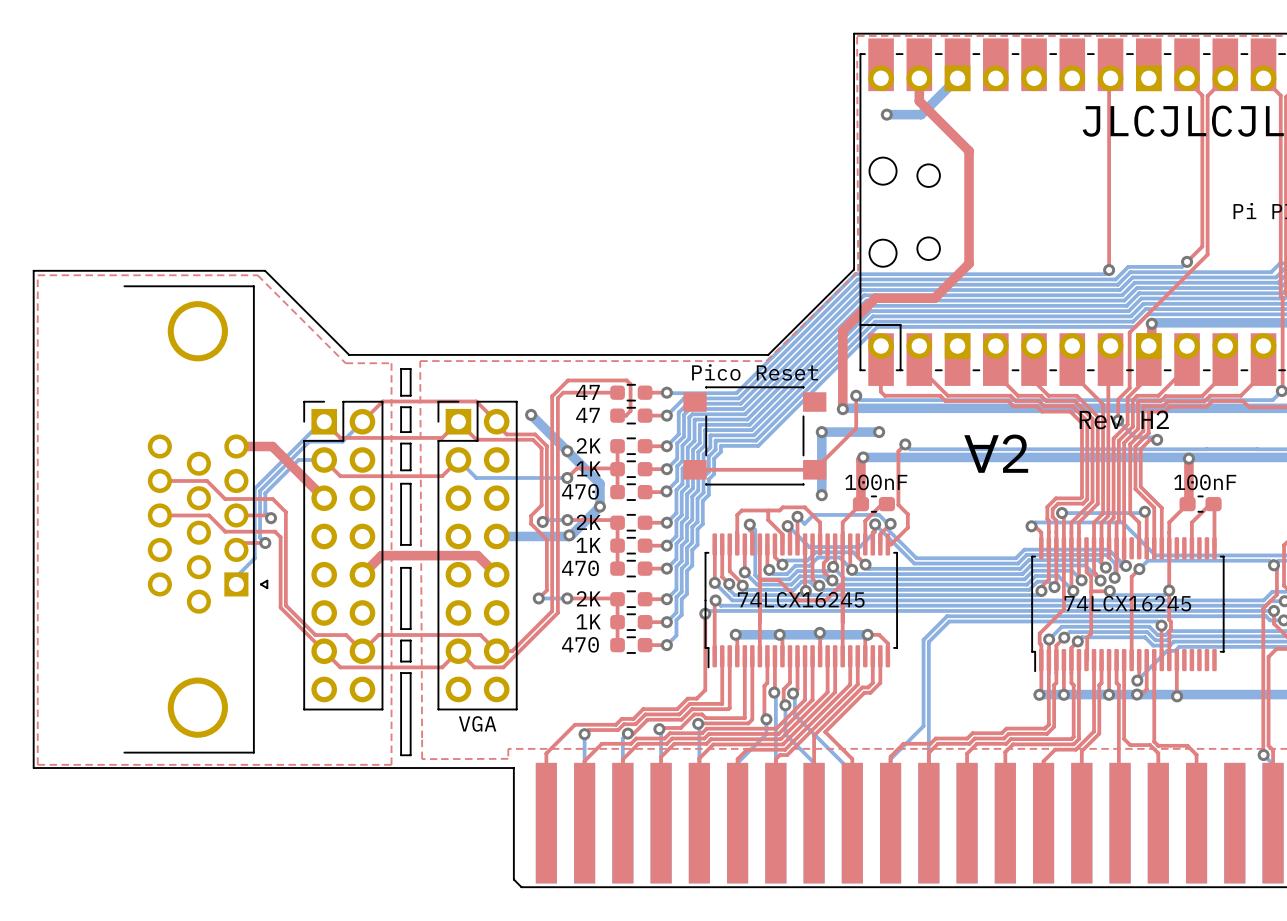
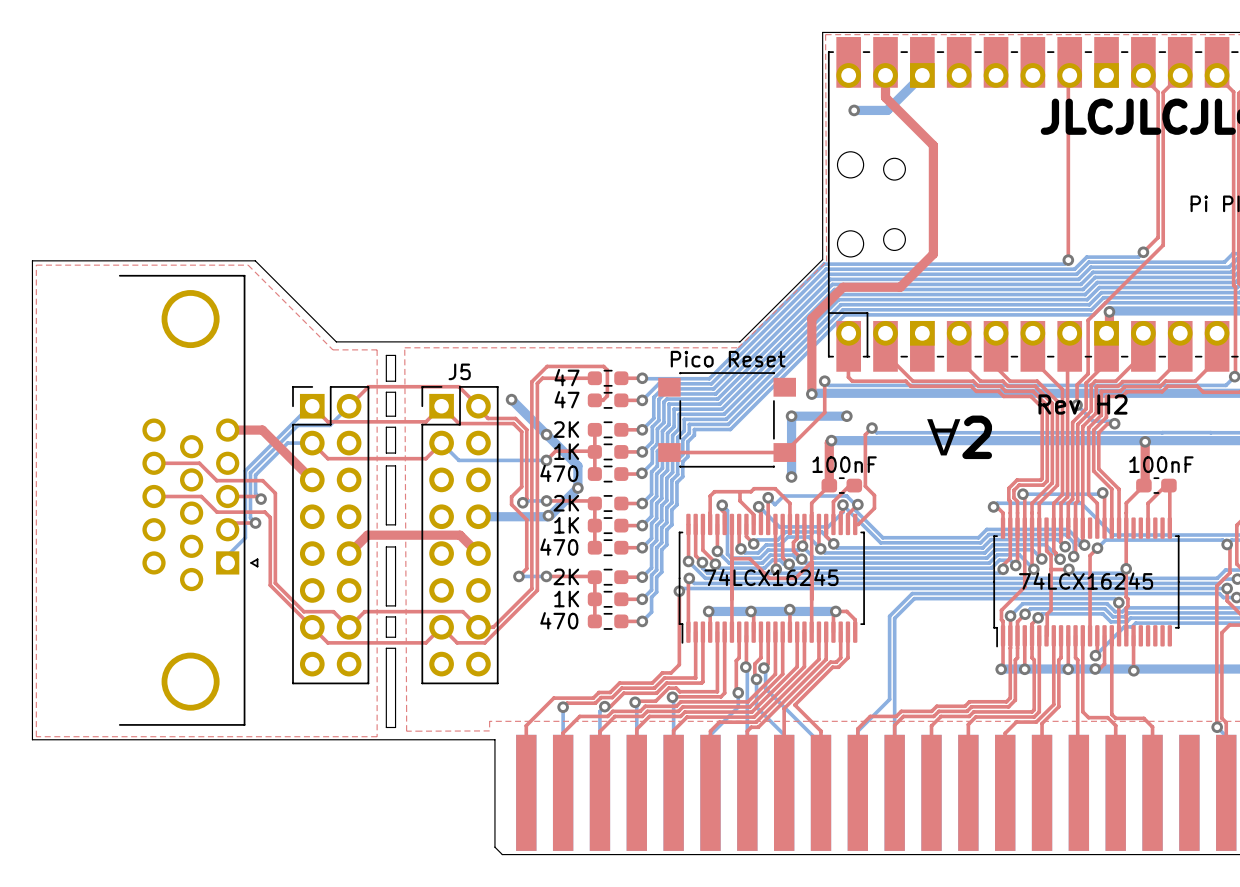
J5 name: none -> J5 (459, 371)
J5 value: VGA (477, 723) -> none

